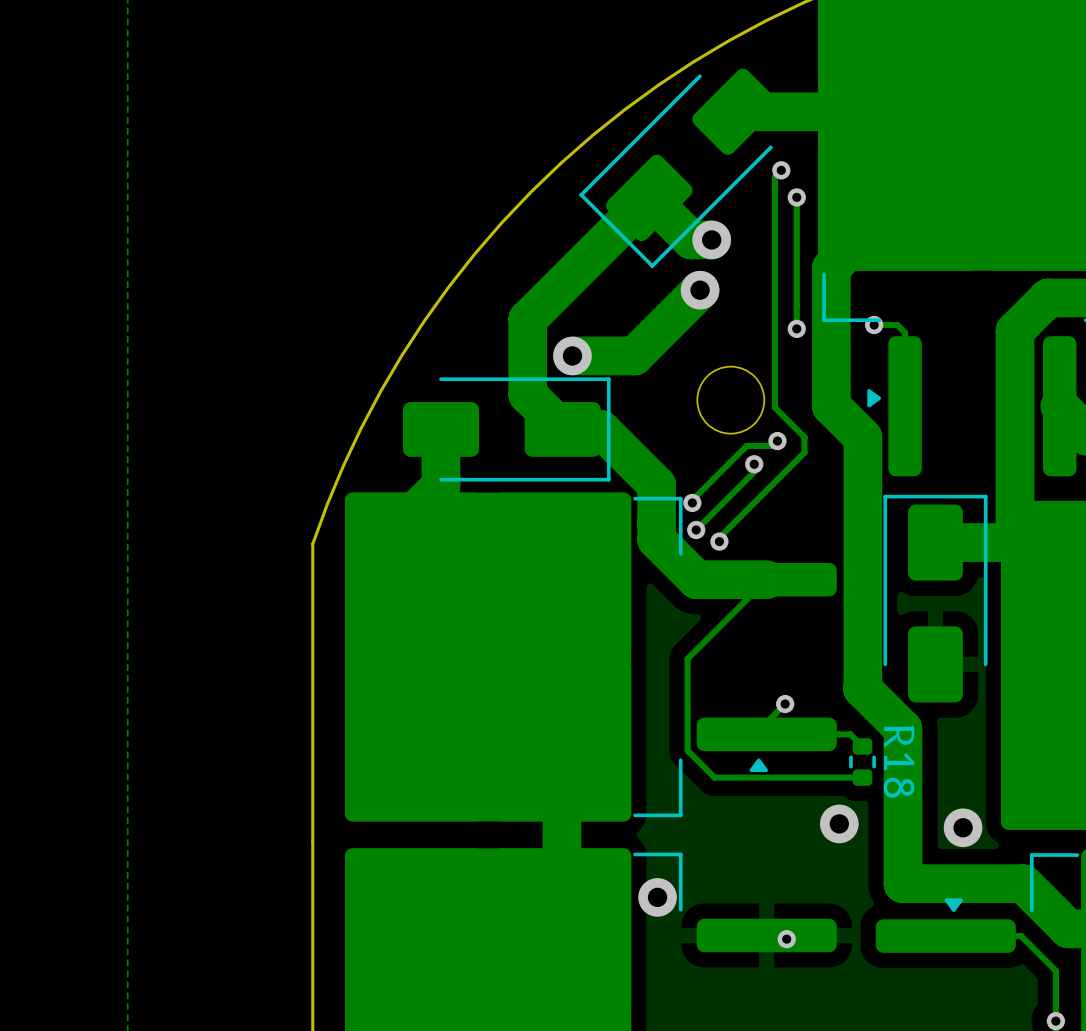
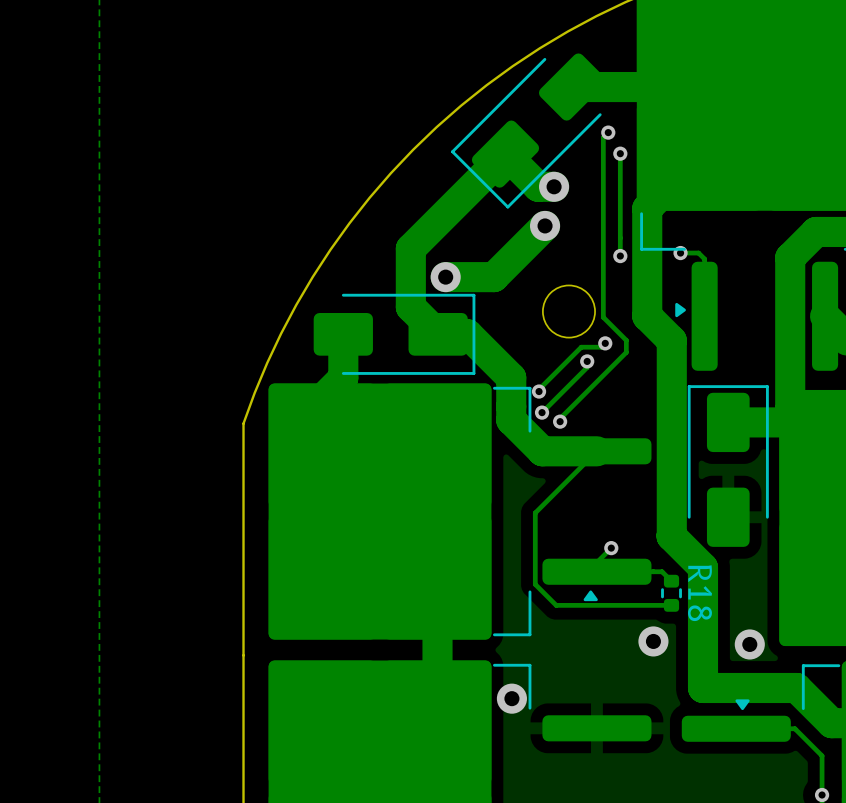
via: (786, 939) -> none

